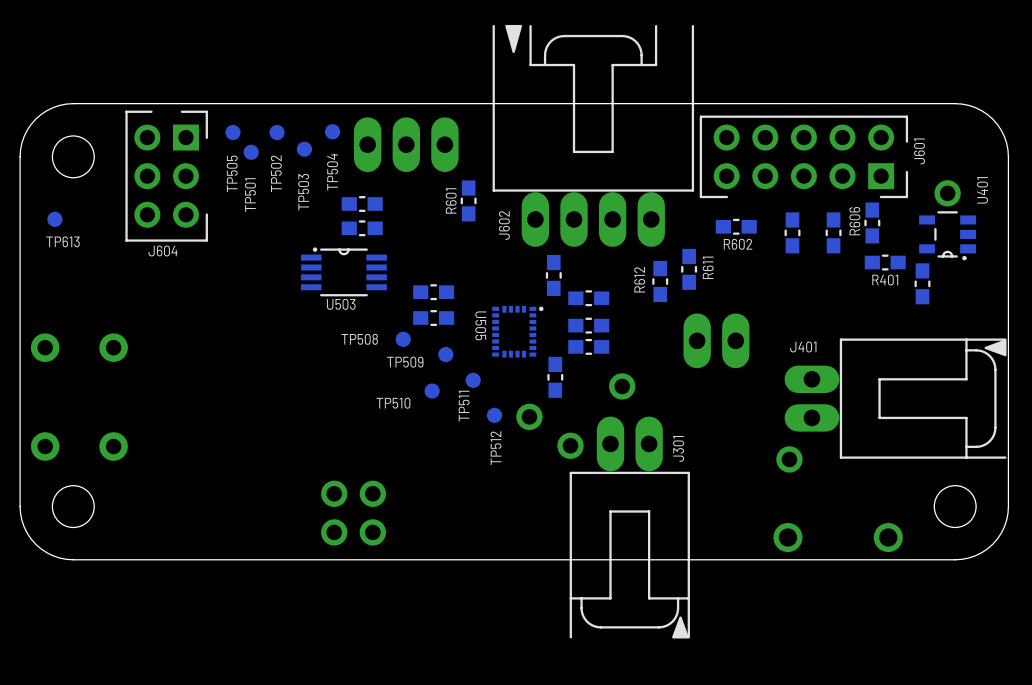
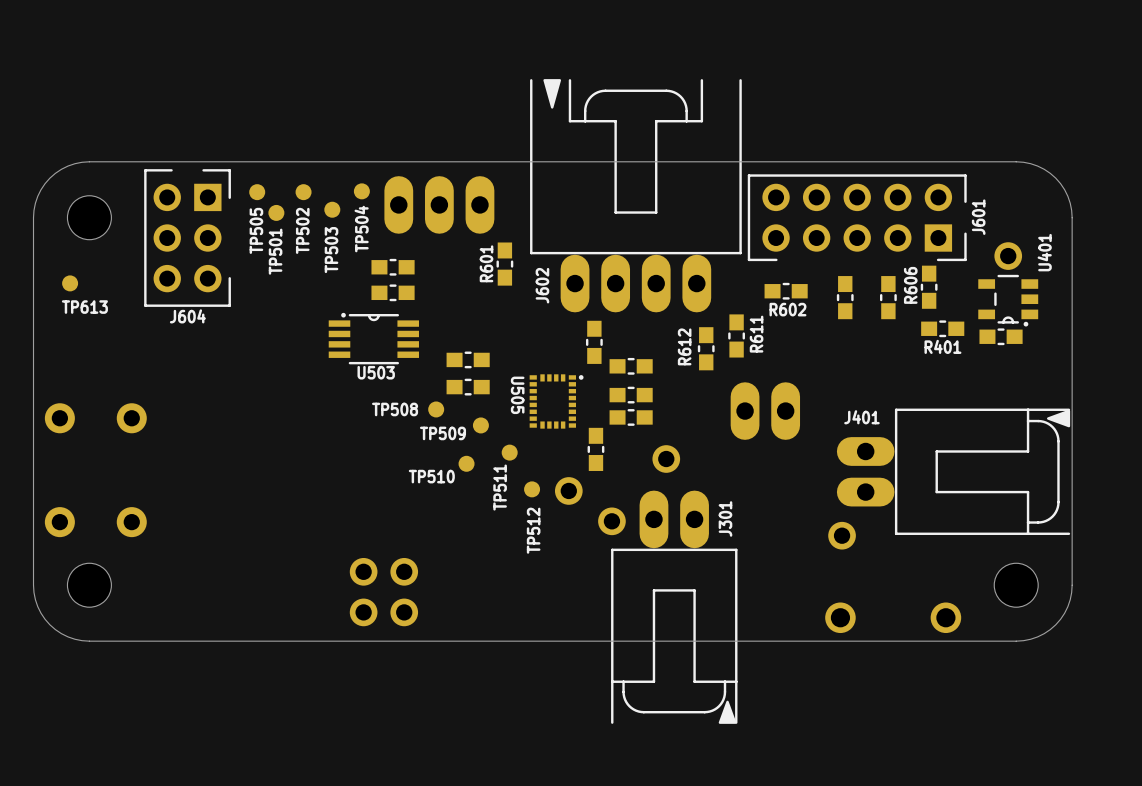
part rotation: 0° (922, 283) -> 90° clockwise (1001, 336)

